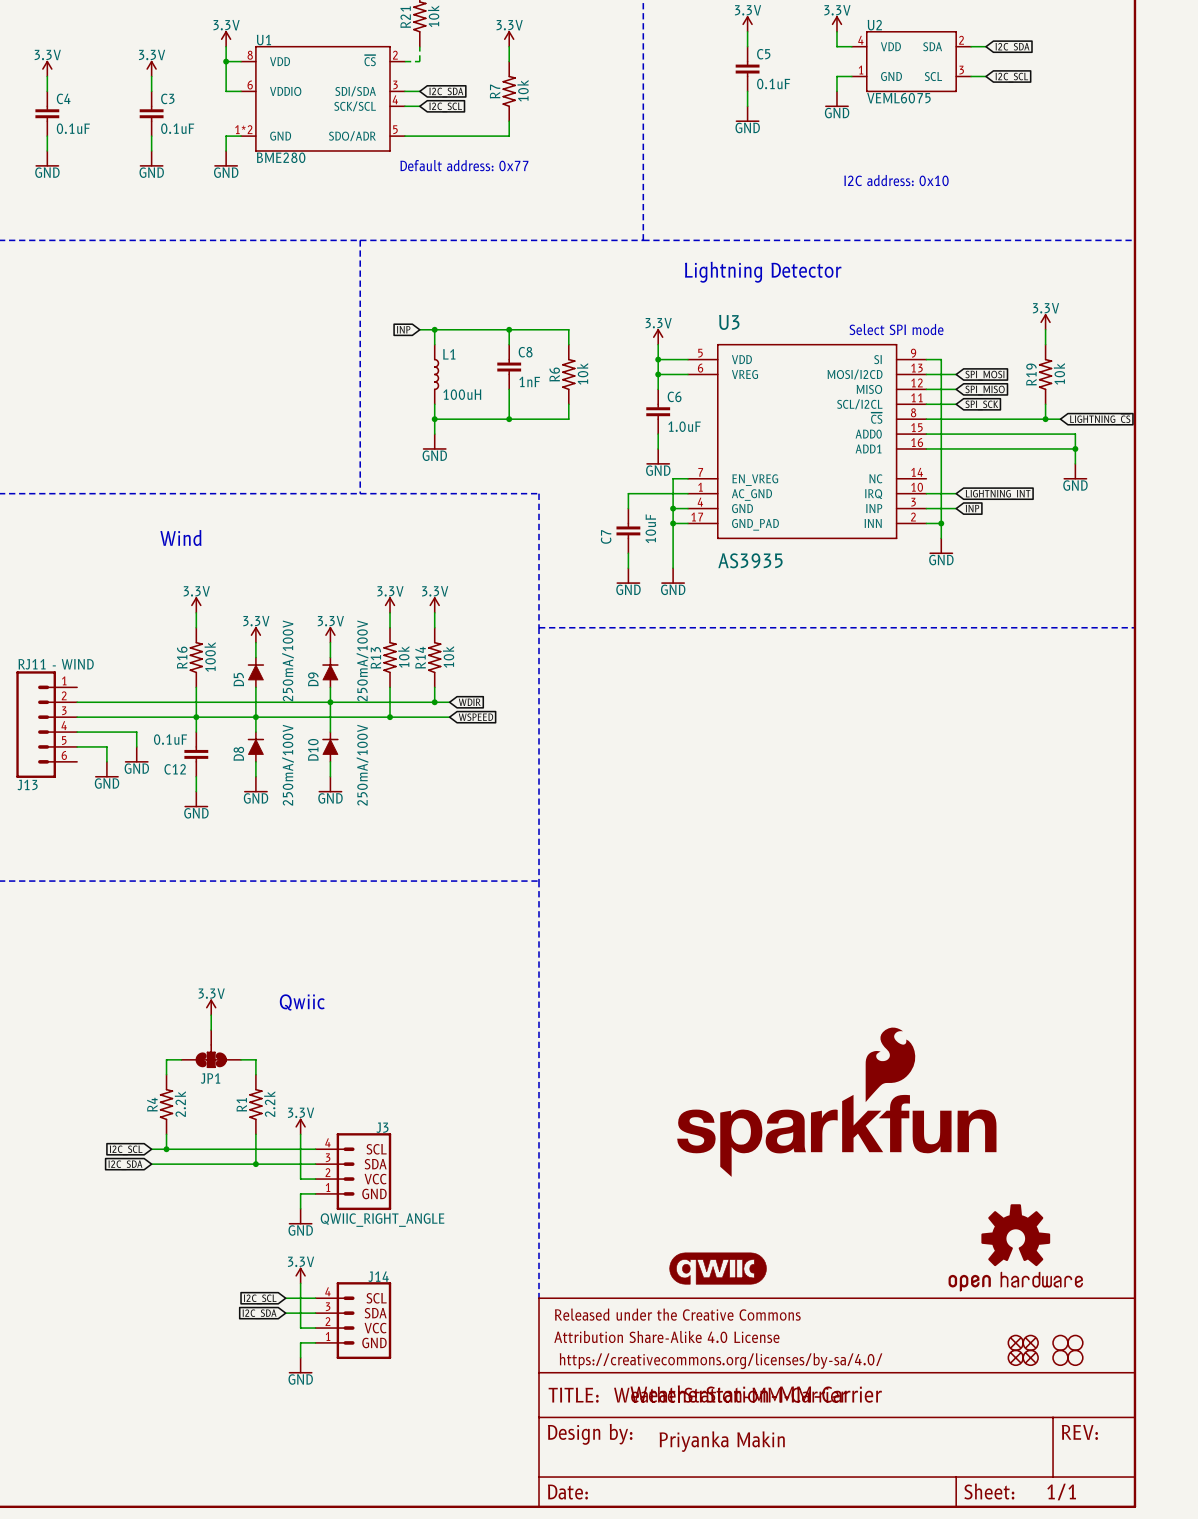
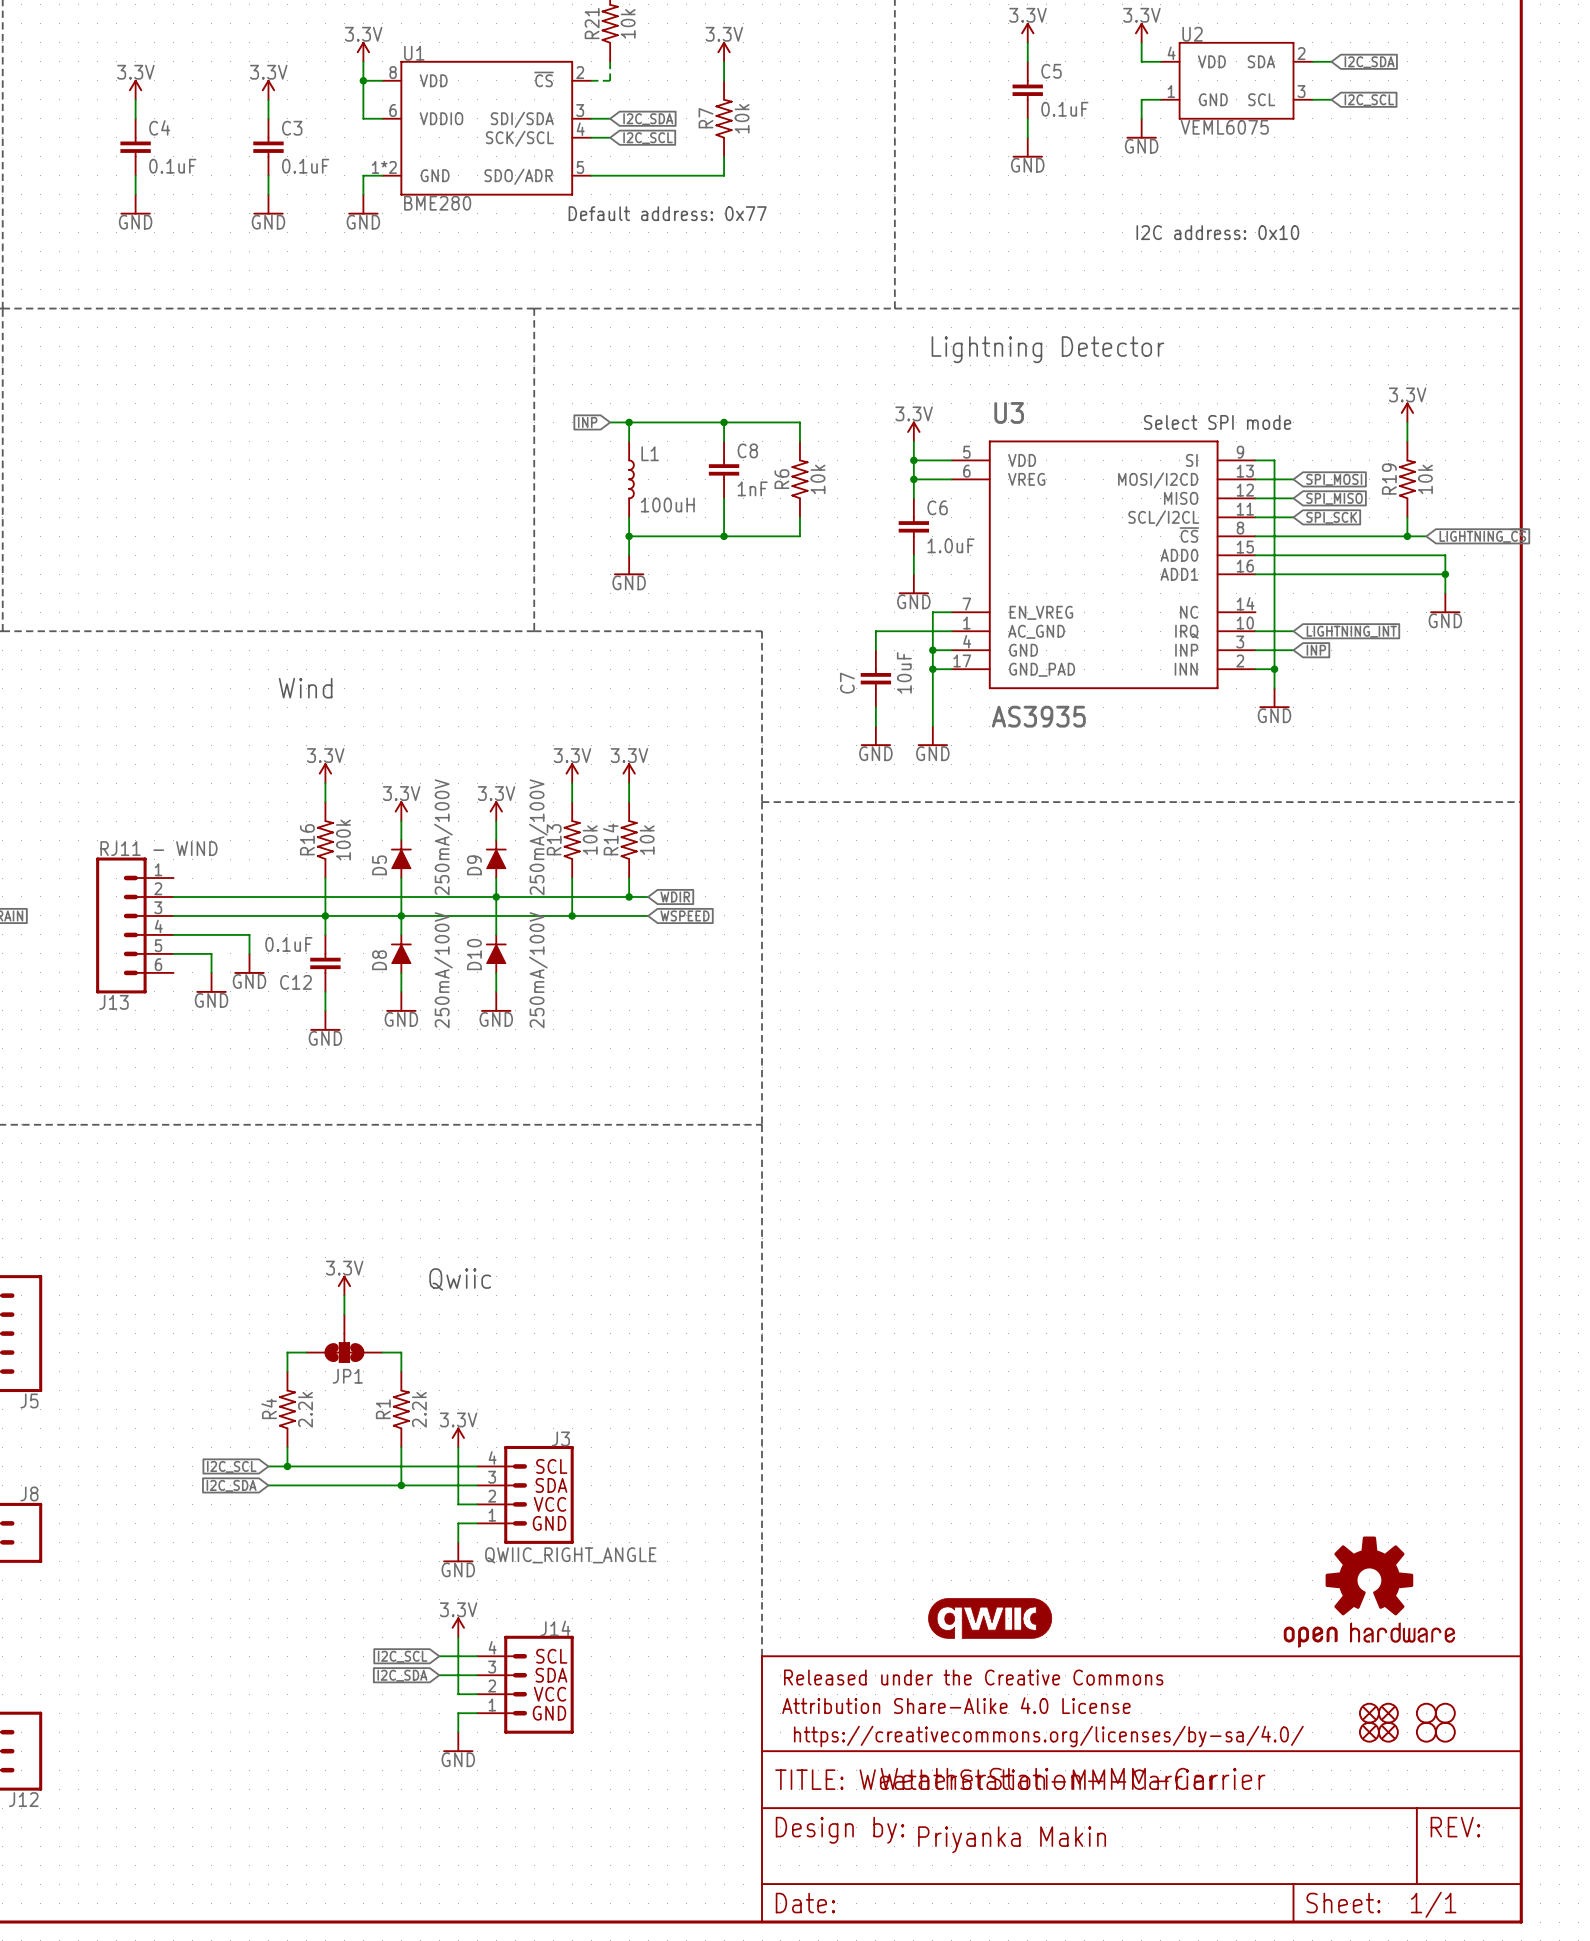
part: (836, 1102) -> none

